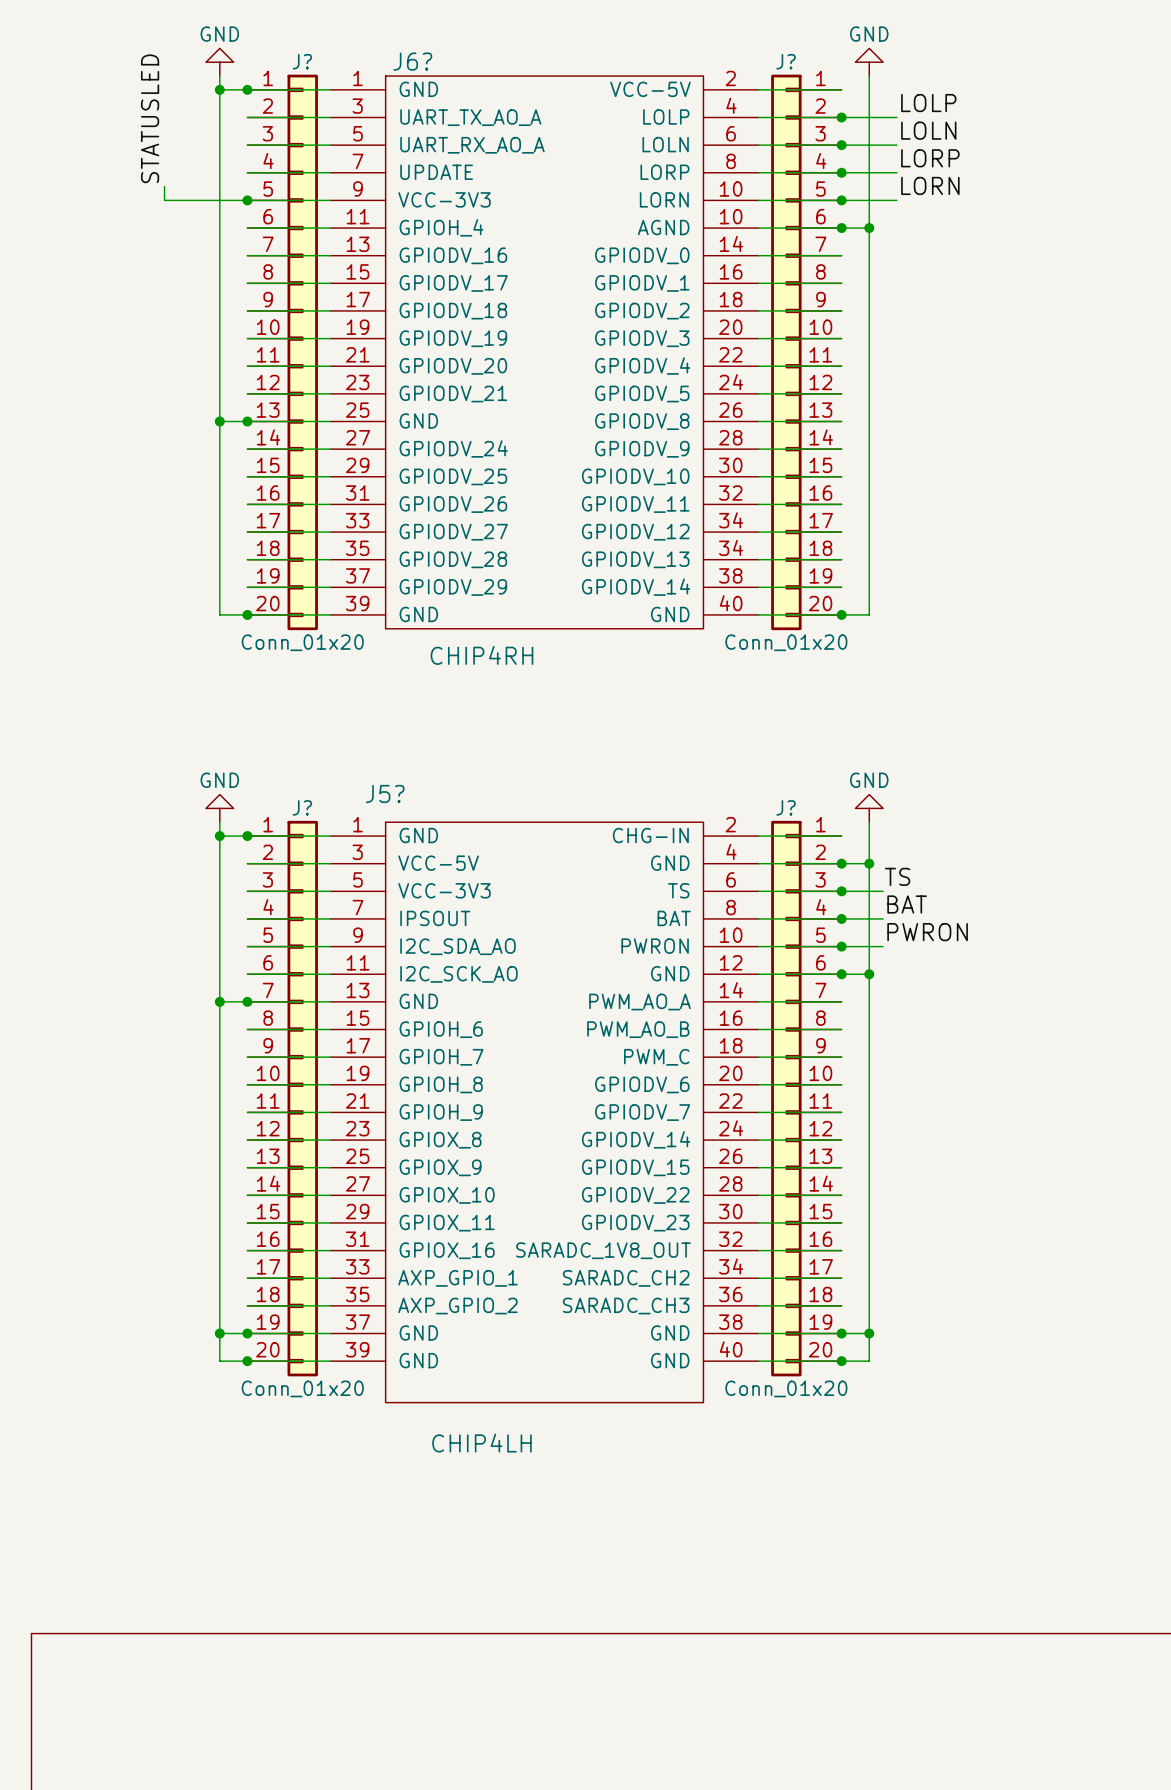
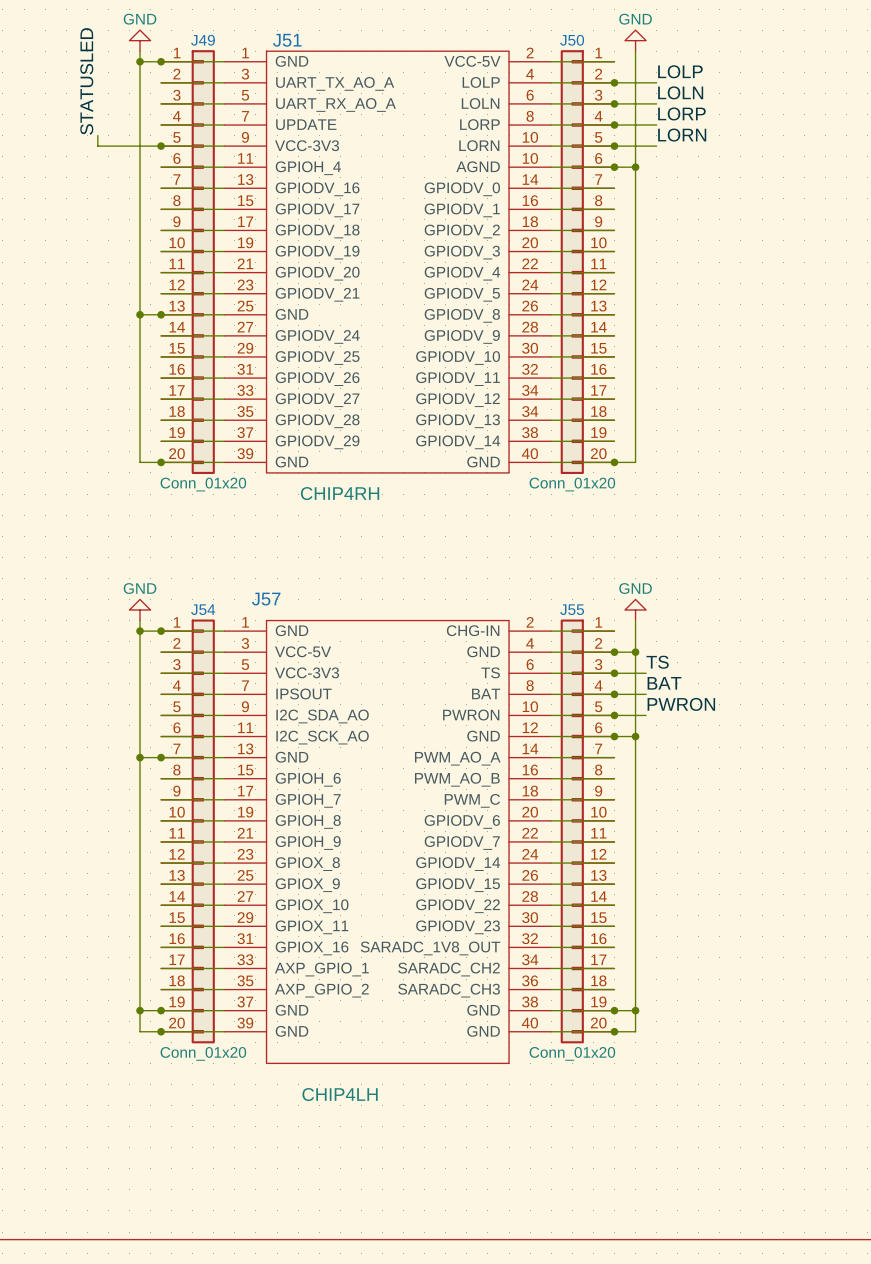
J? name: J? (302, 61) -> J49 (203, 40)
J6? name: J6? (412, 61) -> J51 (287, 40)
J? name: J? (786, 61) -> J50 (572, 40)
J5? name: J5? (385, 793) -> J57 (266, 599)
J? name: J? (302, 807) -> J54 (203, 609)
J? name: J? (786, 807) -> J55 (572, 609)

